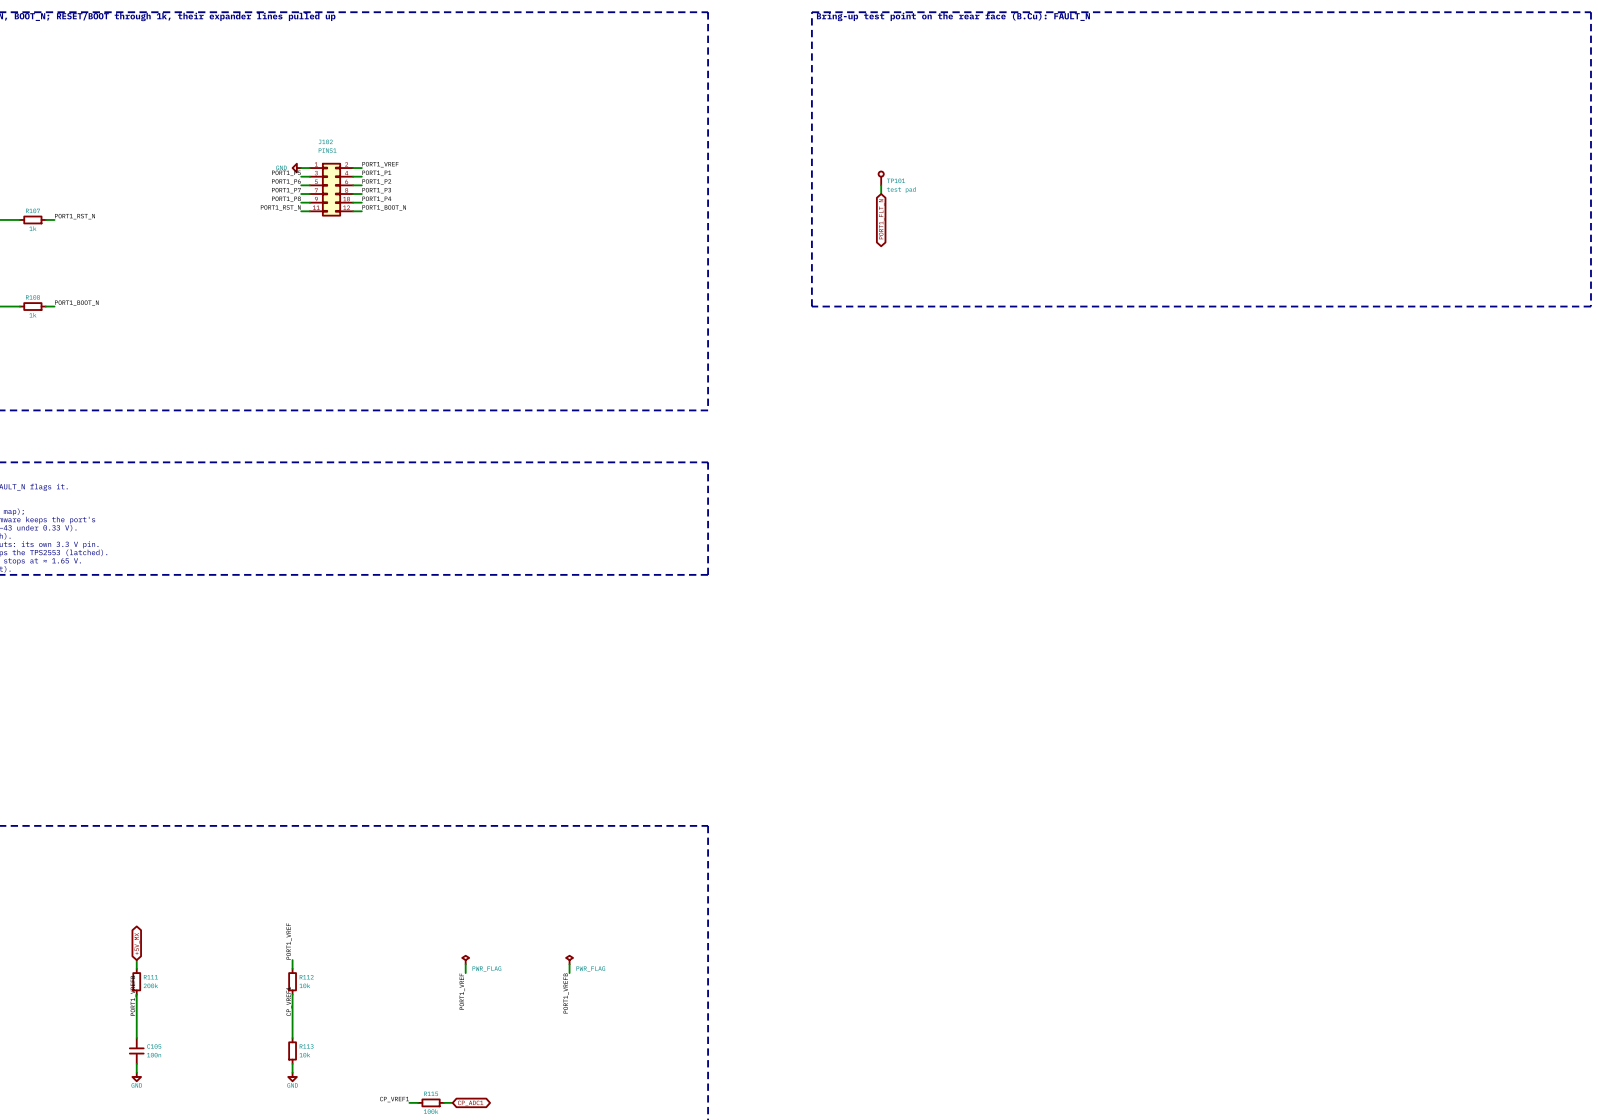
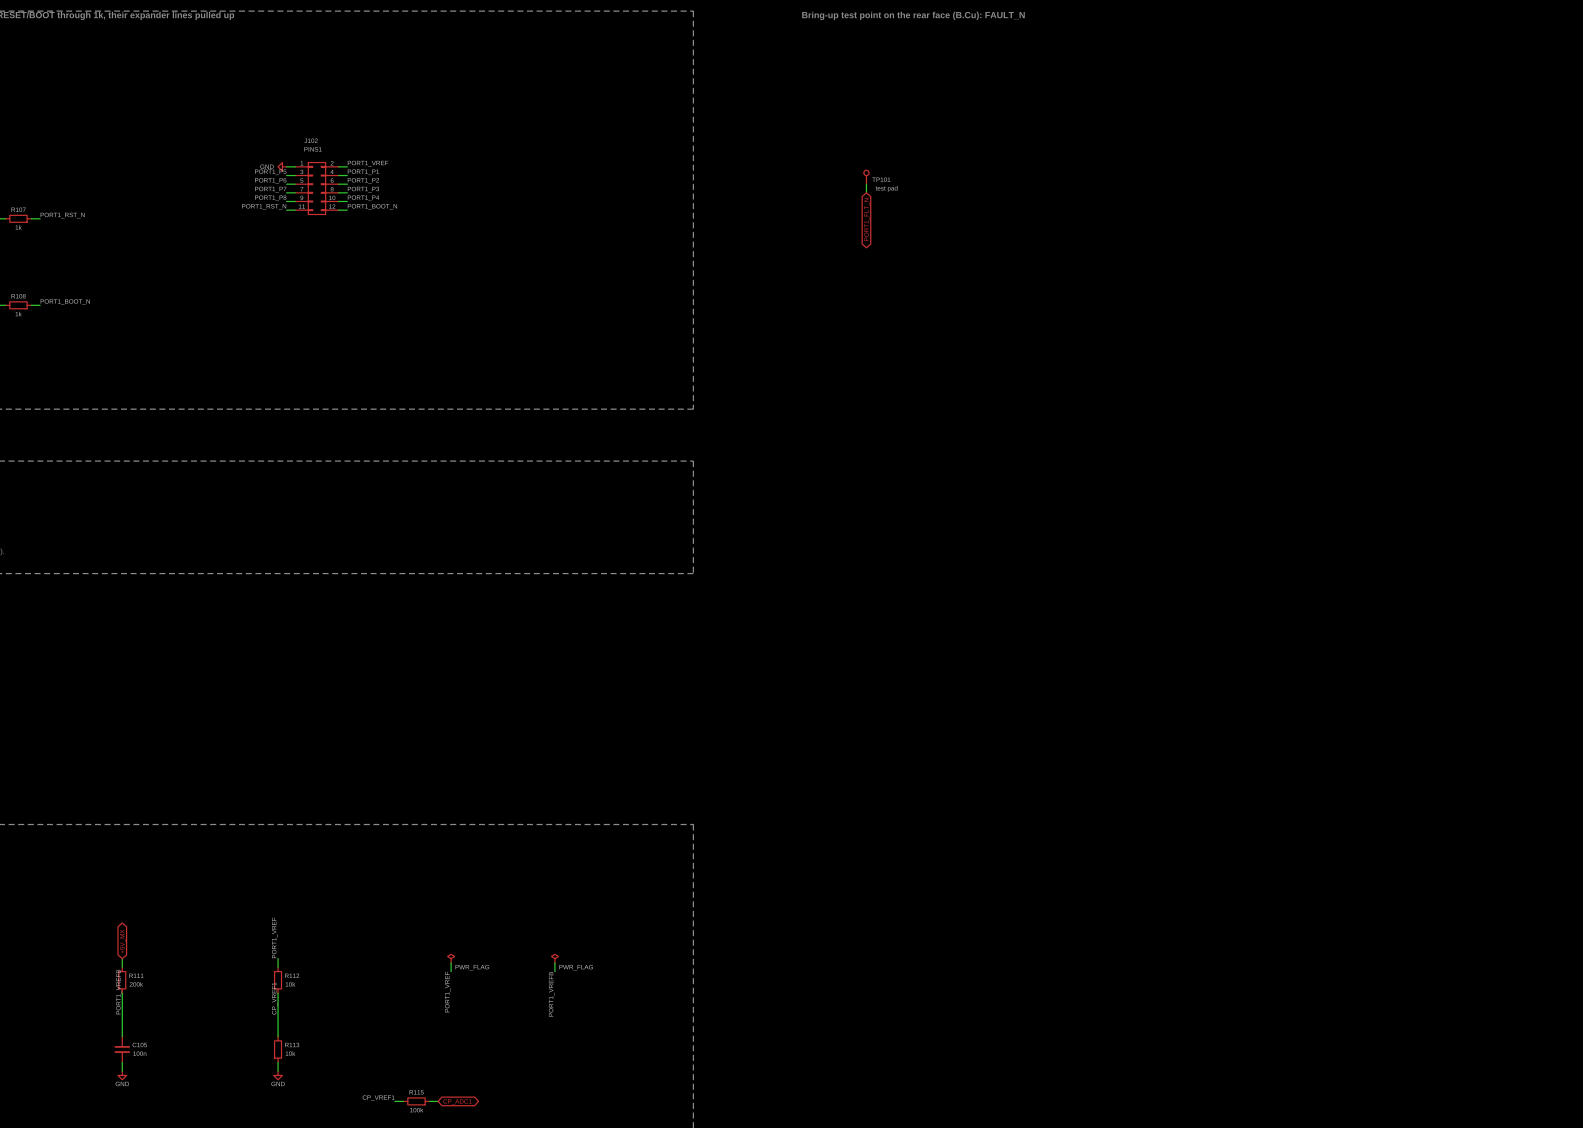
line: (811, 12) (1590, 12) (1590, 306) (811, 306) (811, 12) -> none

